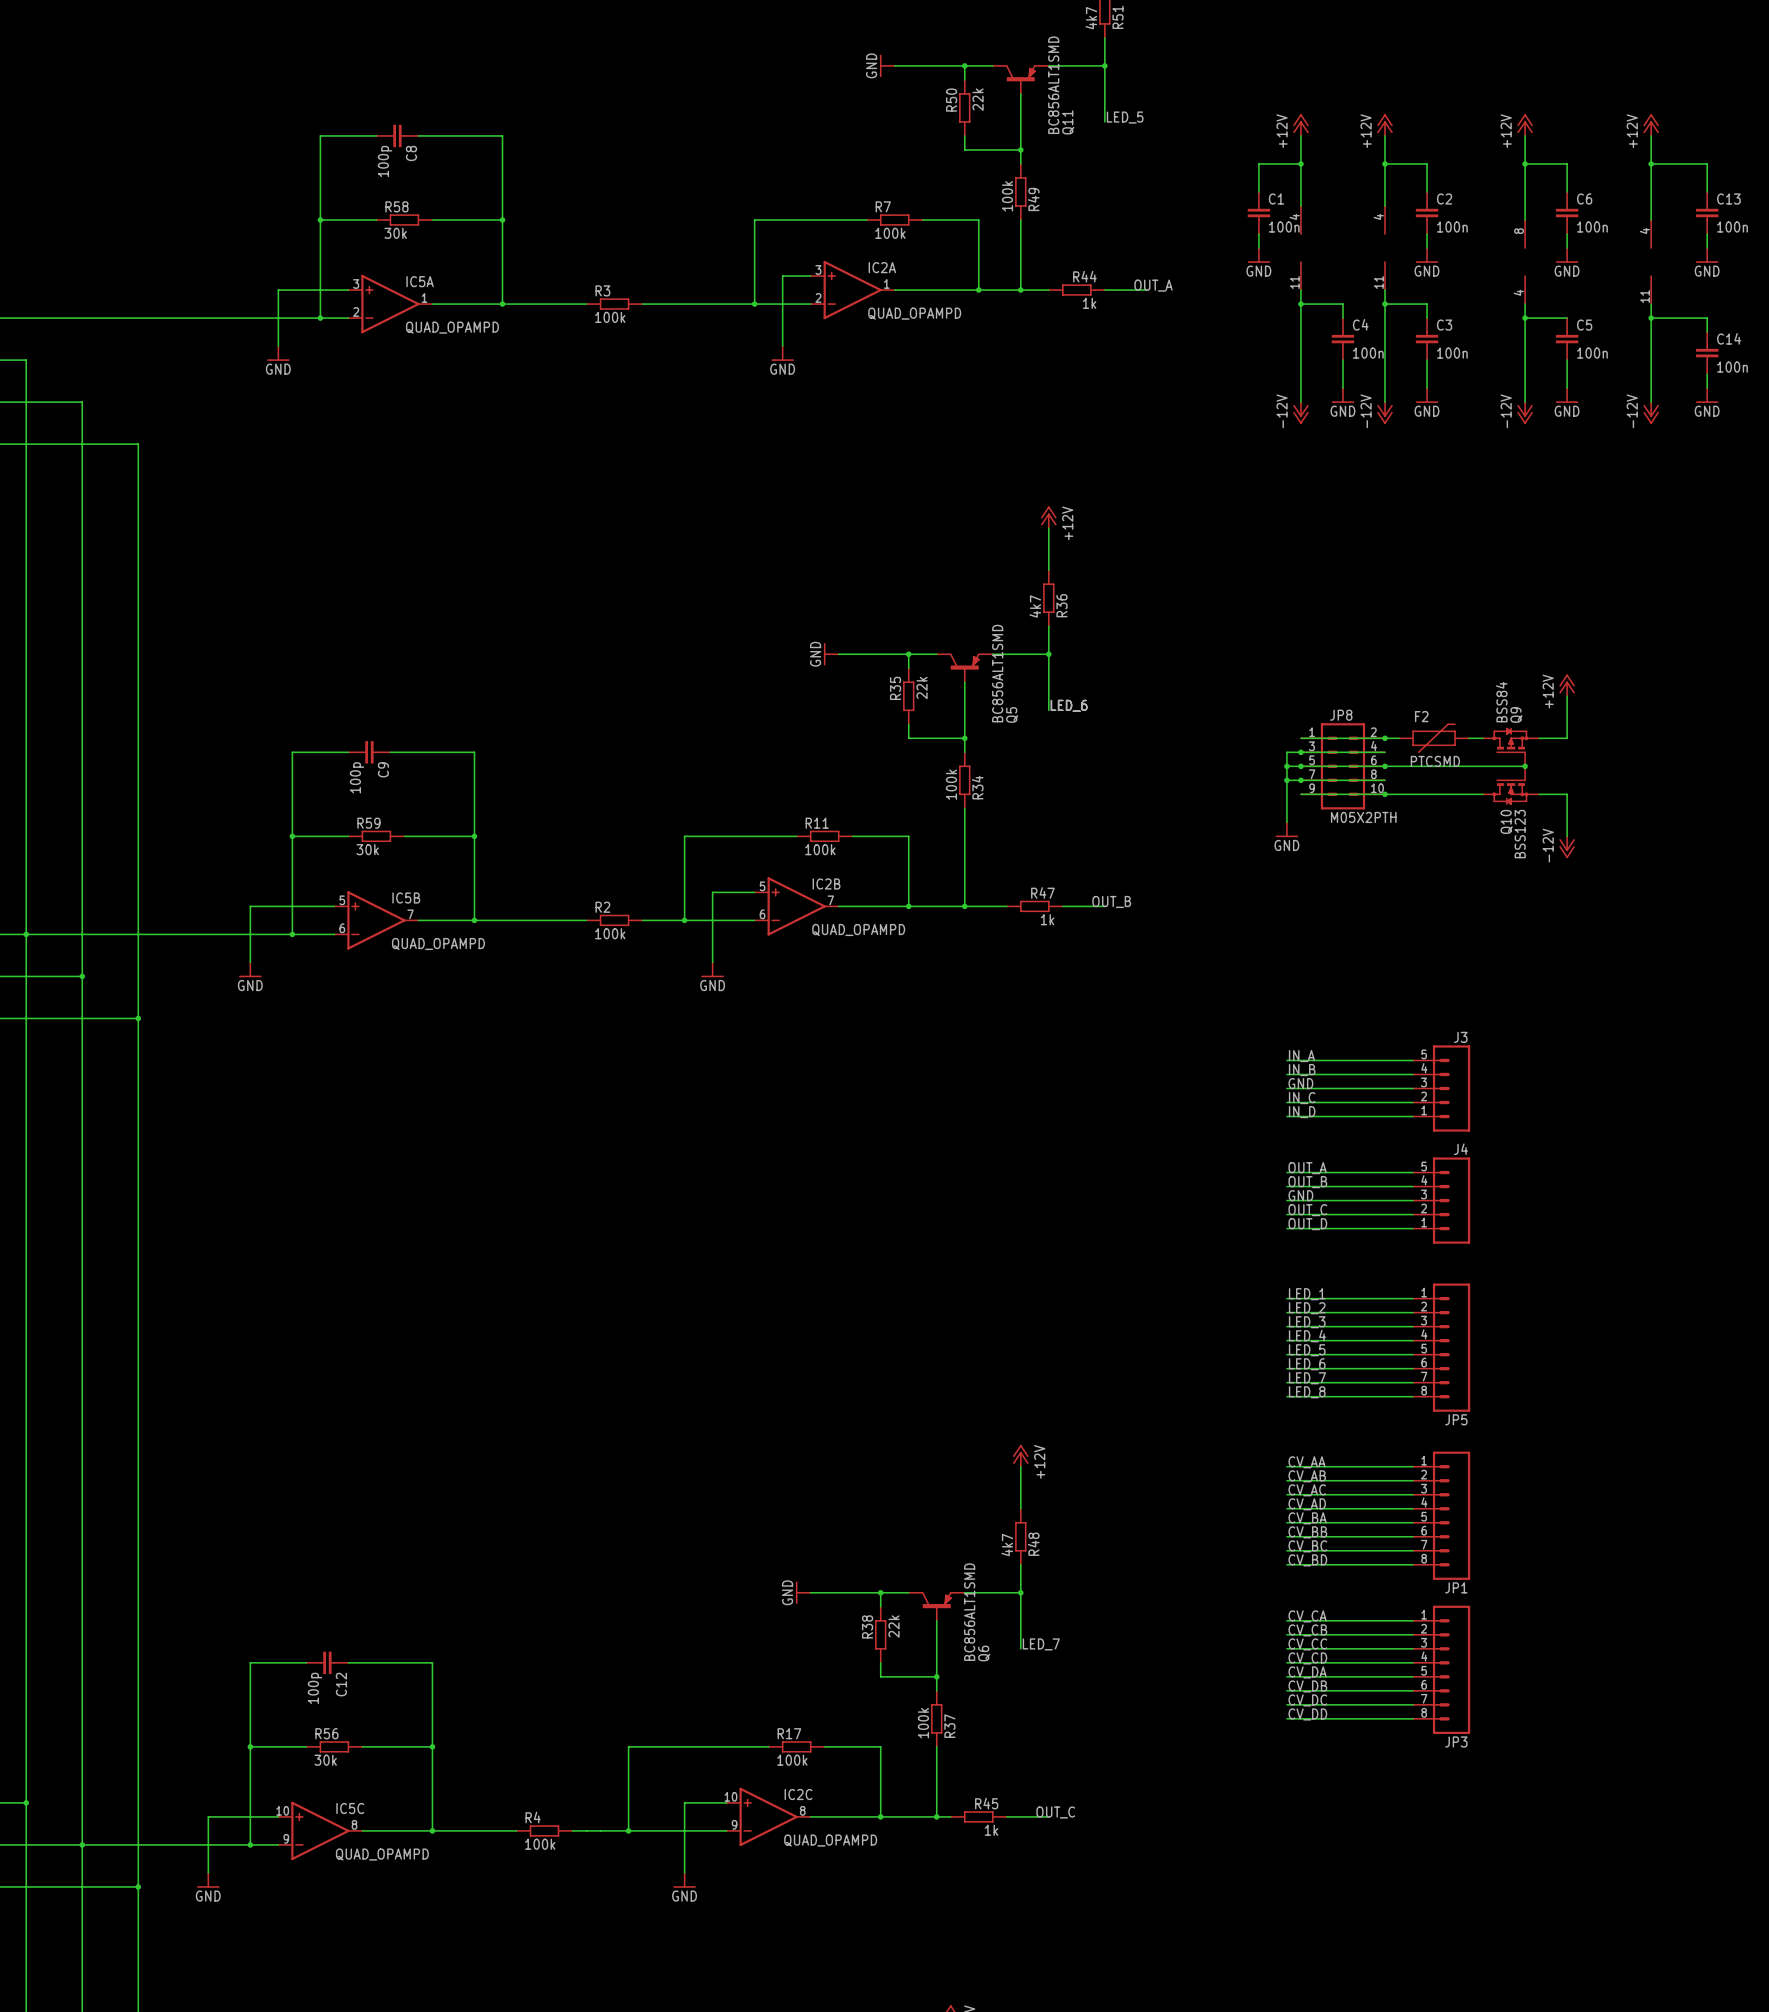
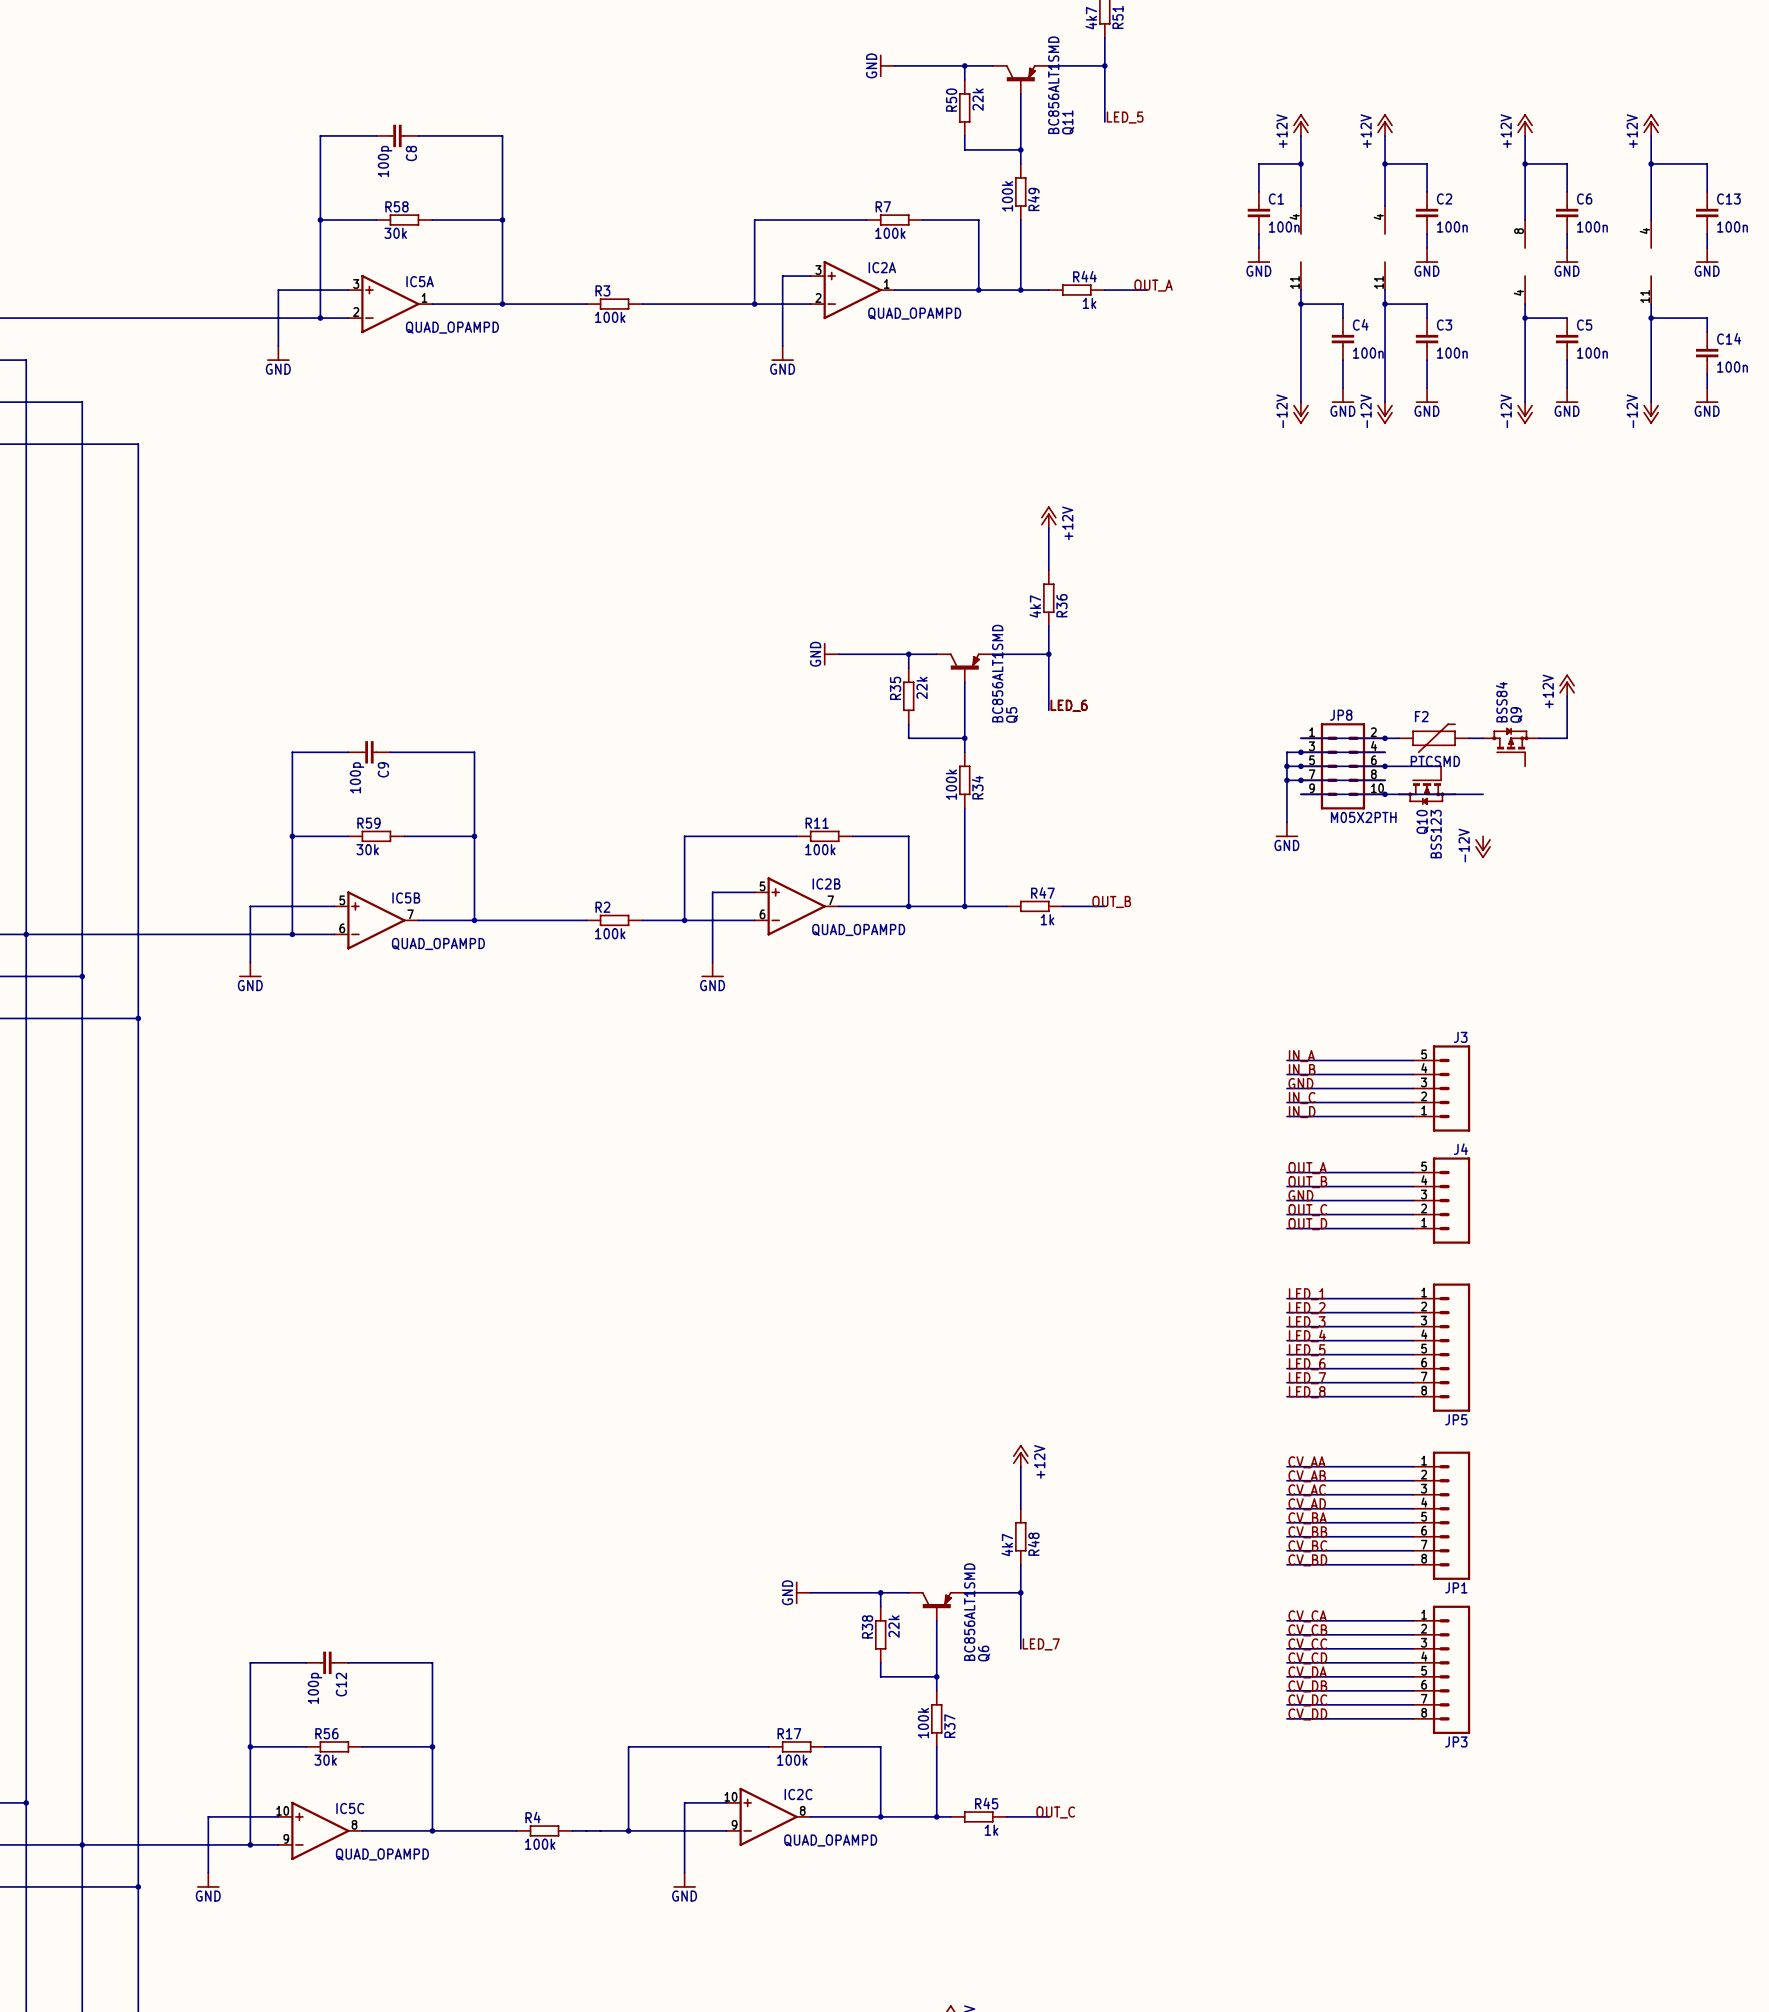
wire: (1441, 766) (1525, 766) -> none
junction: (1525, 766) -> none
Q10 position: (1511, 785) -> (1427, 785)
wire: (1539, 794) (1567, 794) (1567, 836) -> none
power symbol position: -12V (1567, 847) -> -12V (1483, 847)

